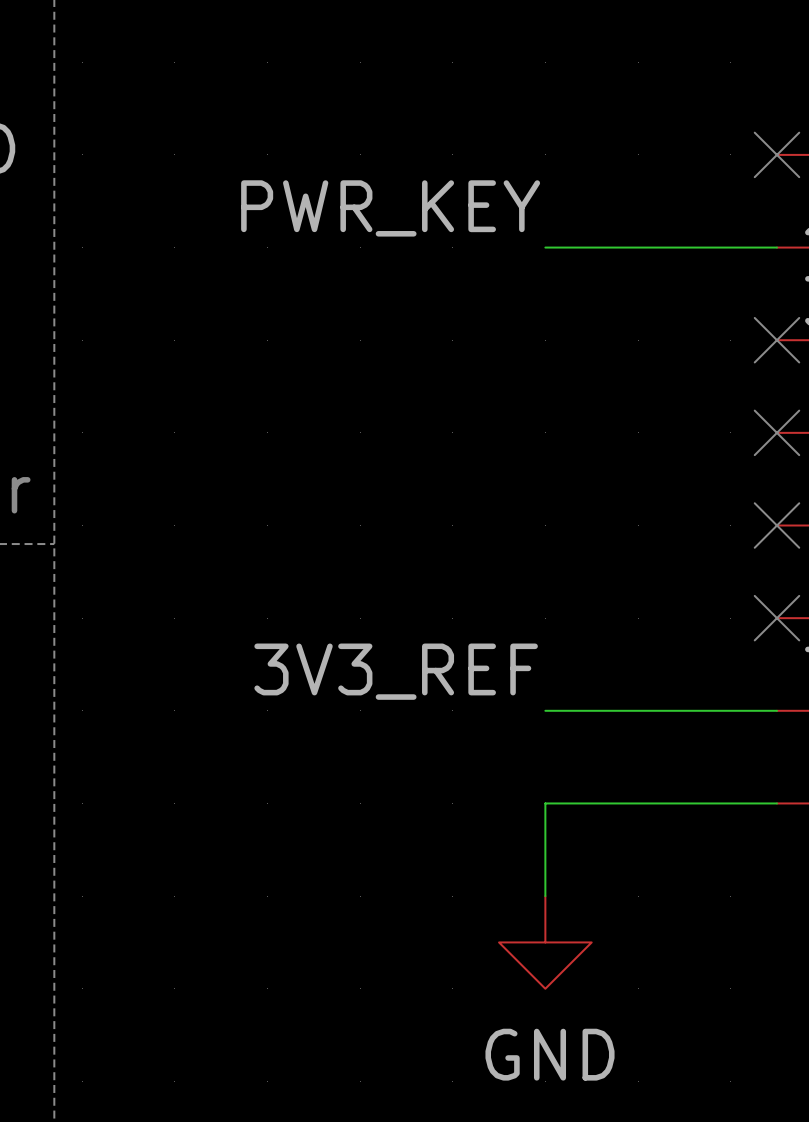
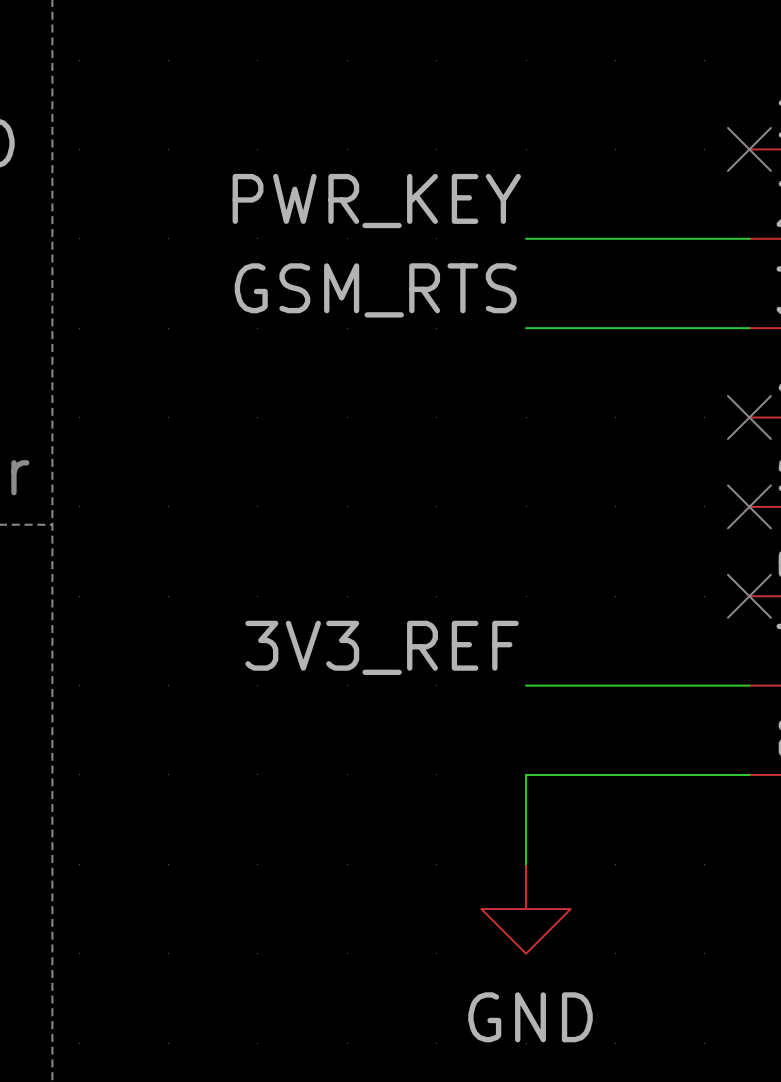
label: none -> GSM_RTS (375, 290)
wire: none -> (526, 328) (749, 328)
no-connect mark: (776, 340) -> none

